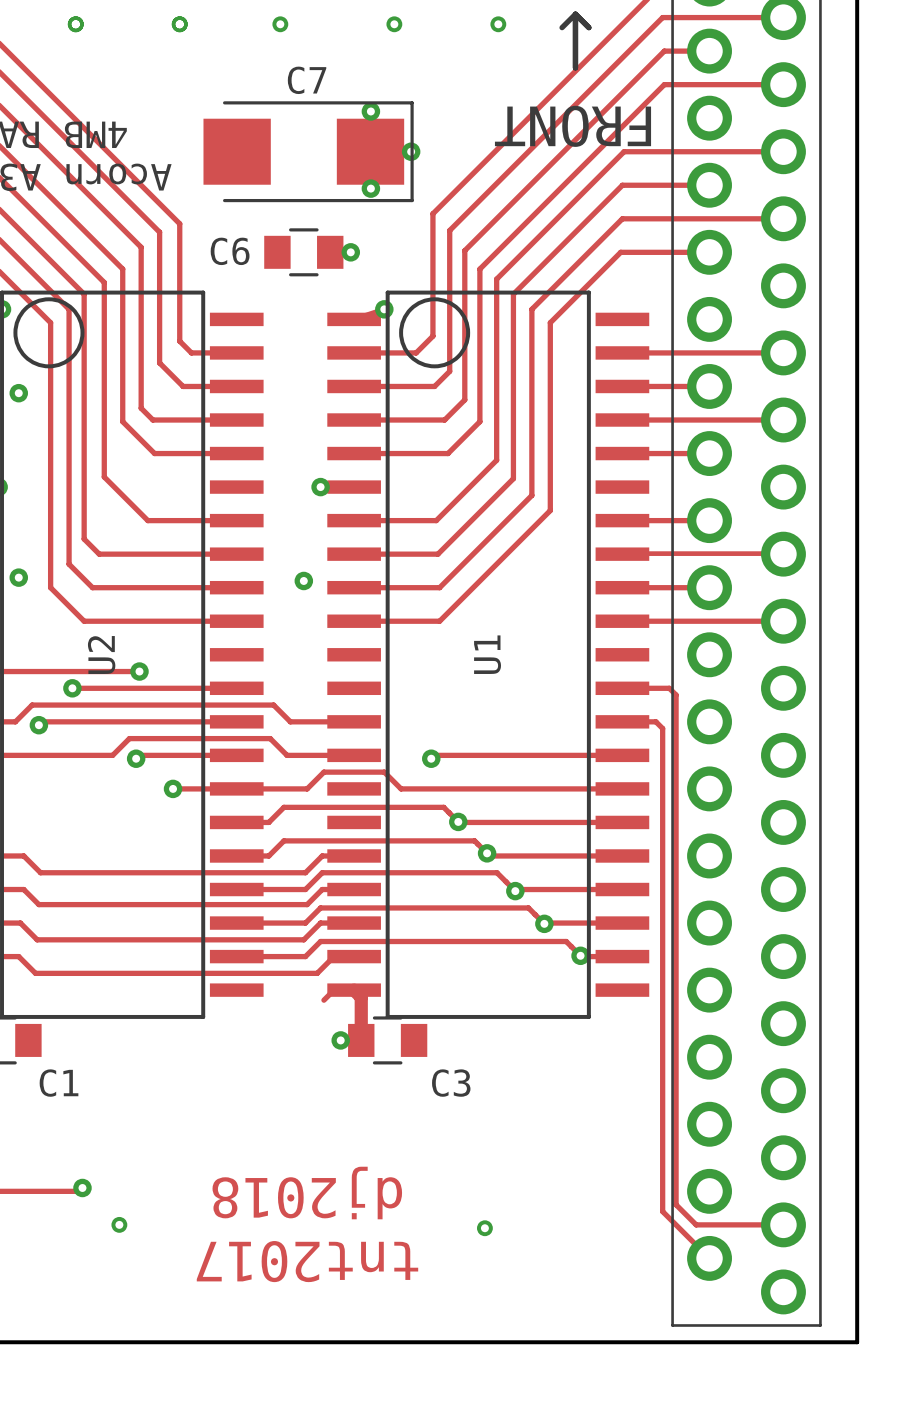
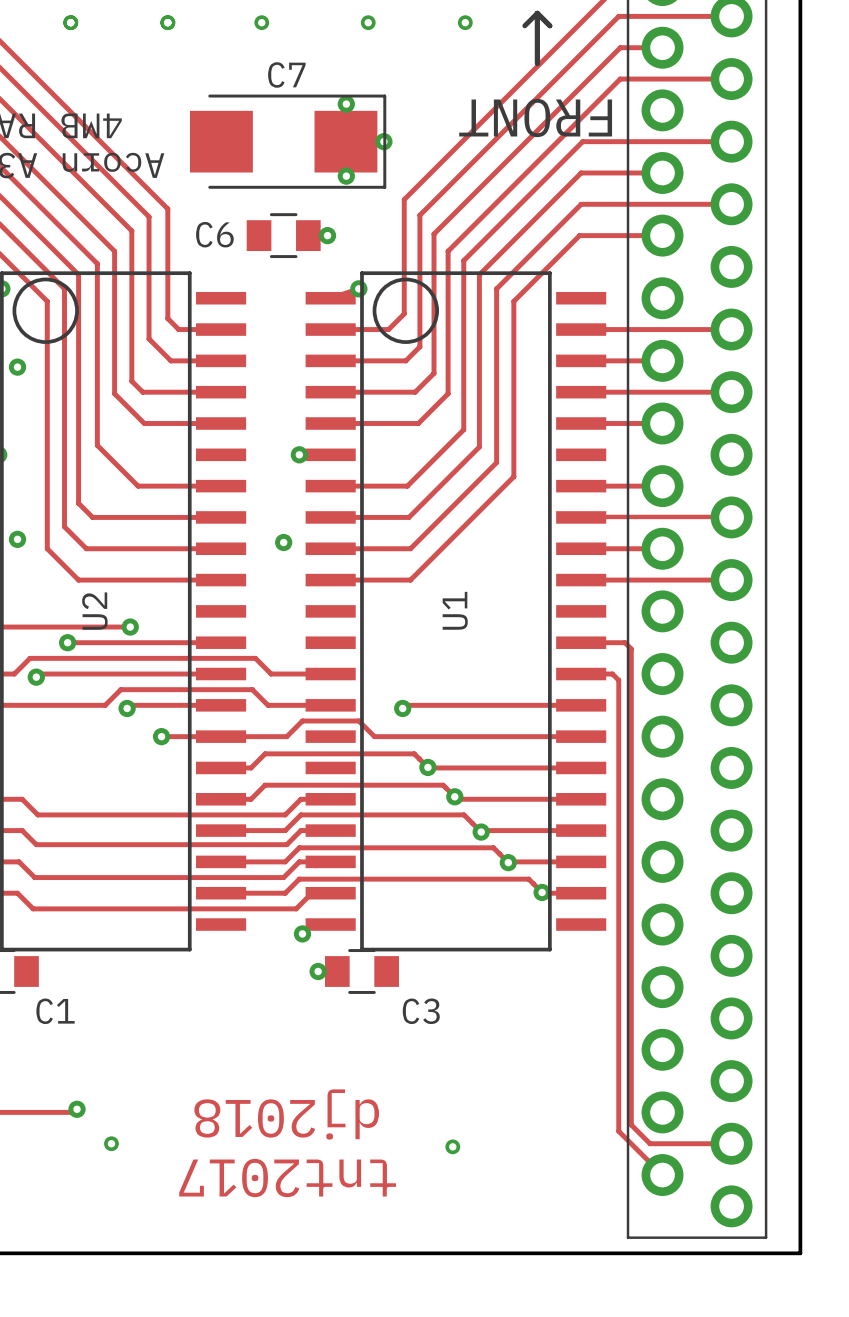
track: (354, 990) (361, 997) (361, 1040) -> none
via: none -> (302, 933)

